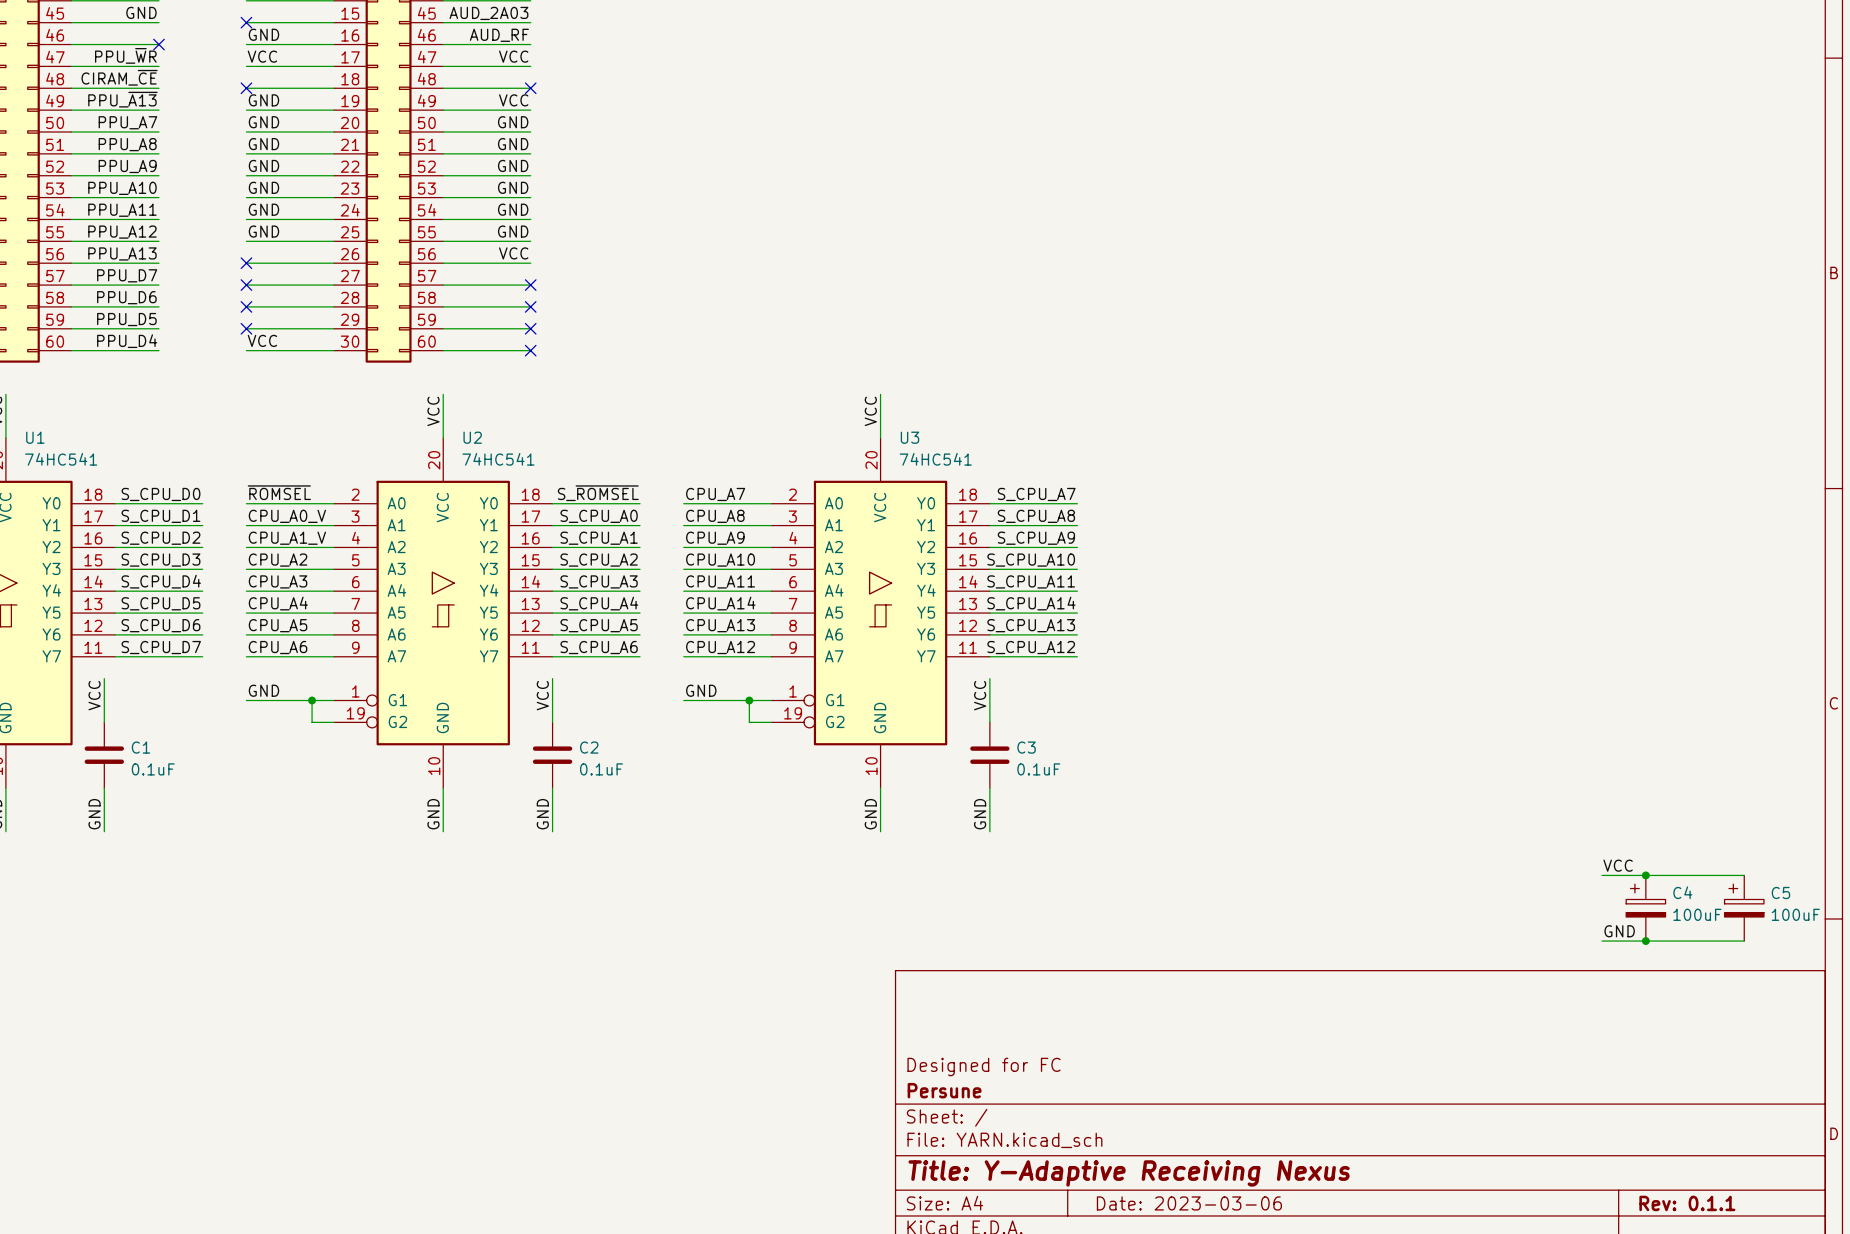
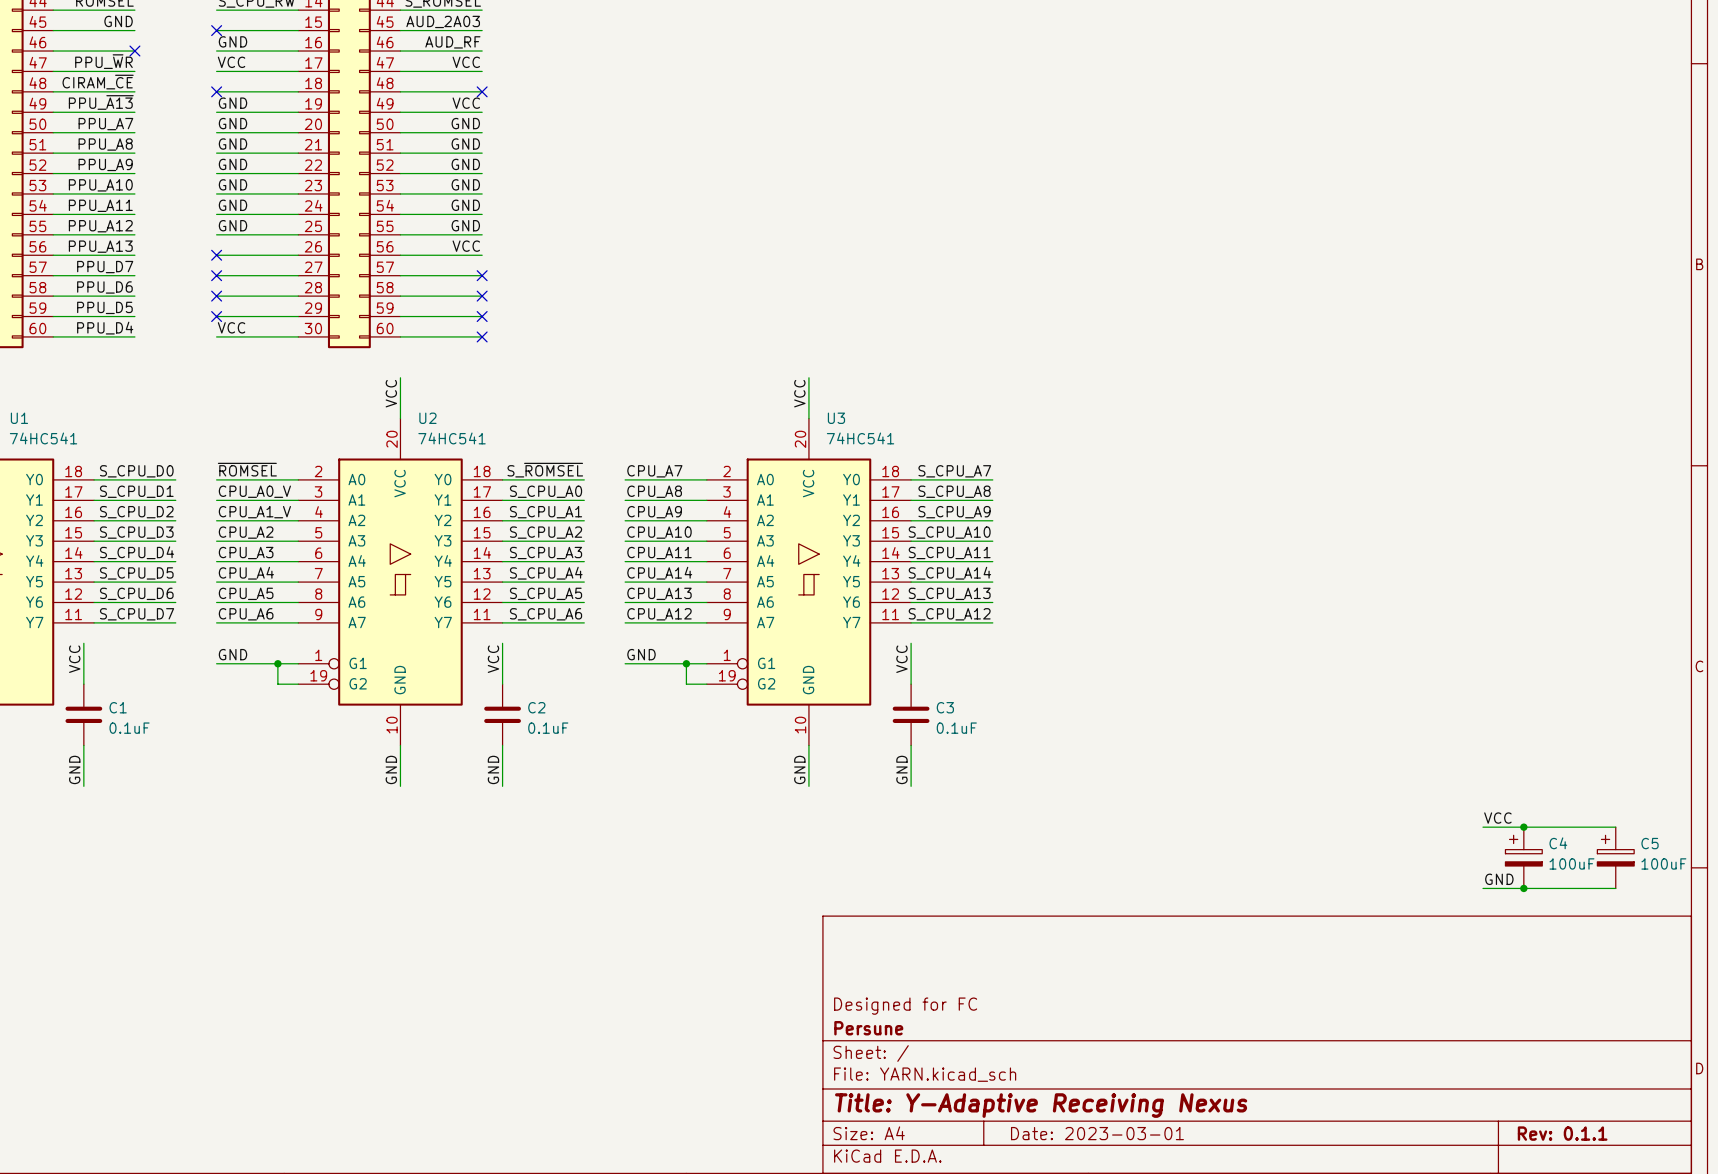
title block: Date: 2023-03-06 (1189, 1203) -> Date: 2023-03-01 (1097, 1133)

